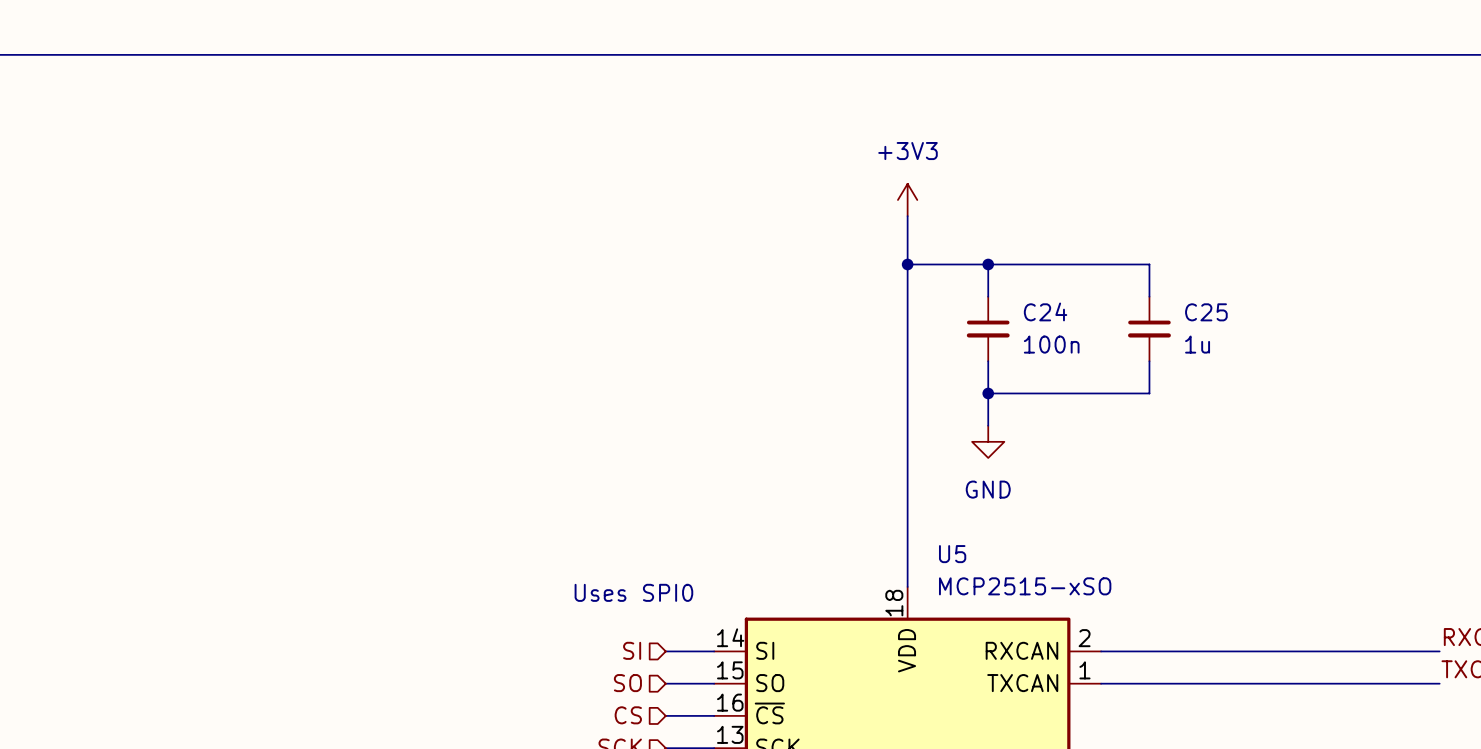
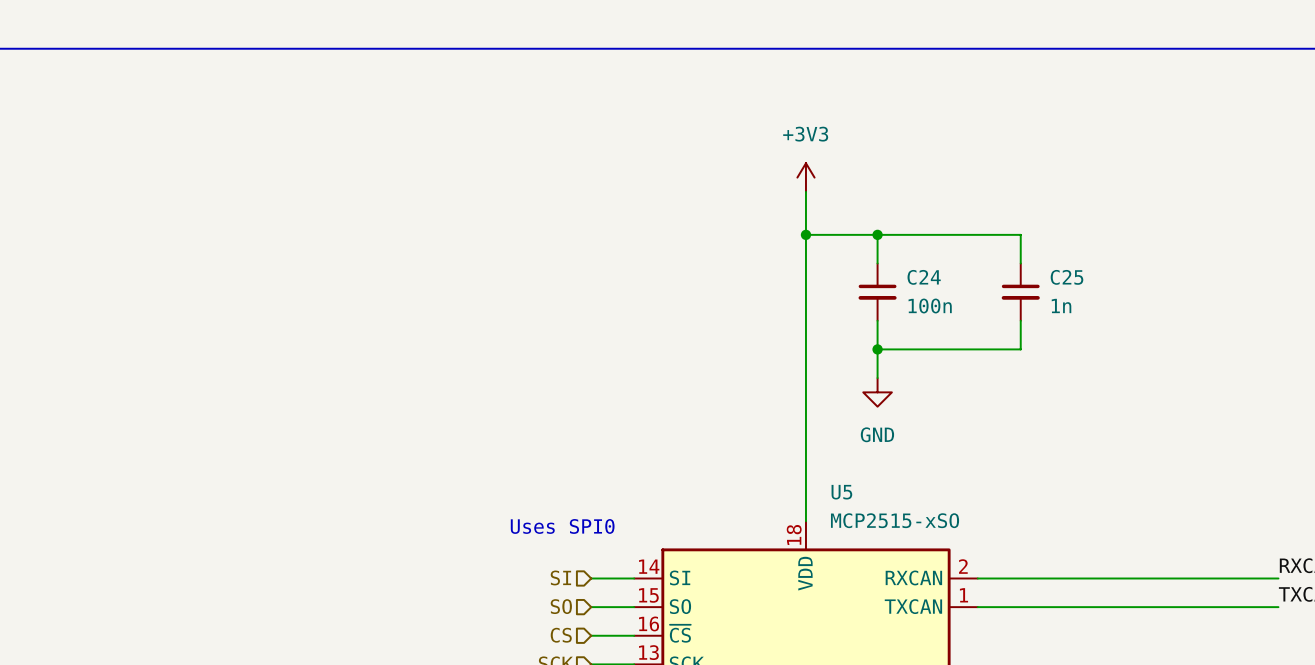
C25 value: 1u (1197, 344) -> 1n (1061, 305)

